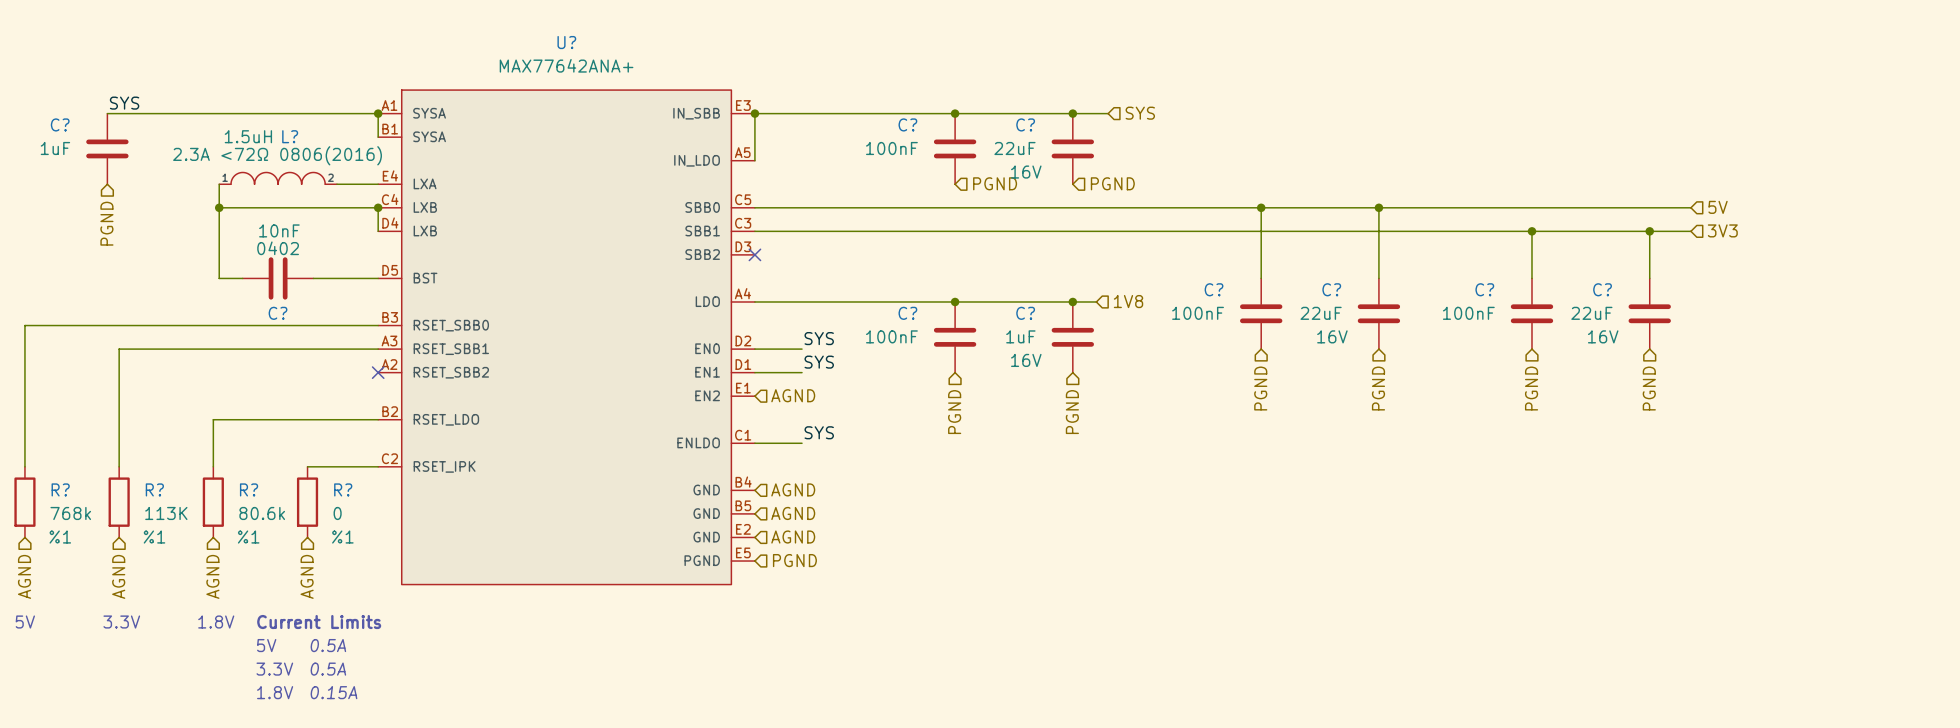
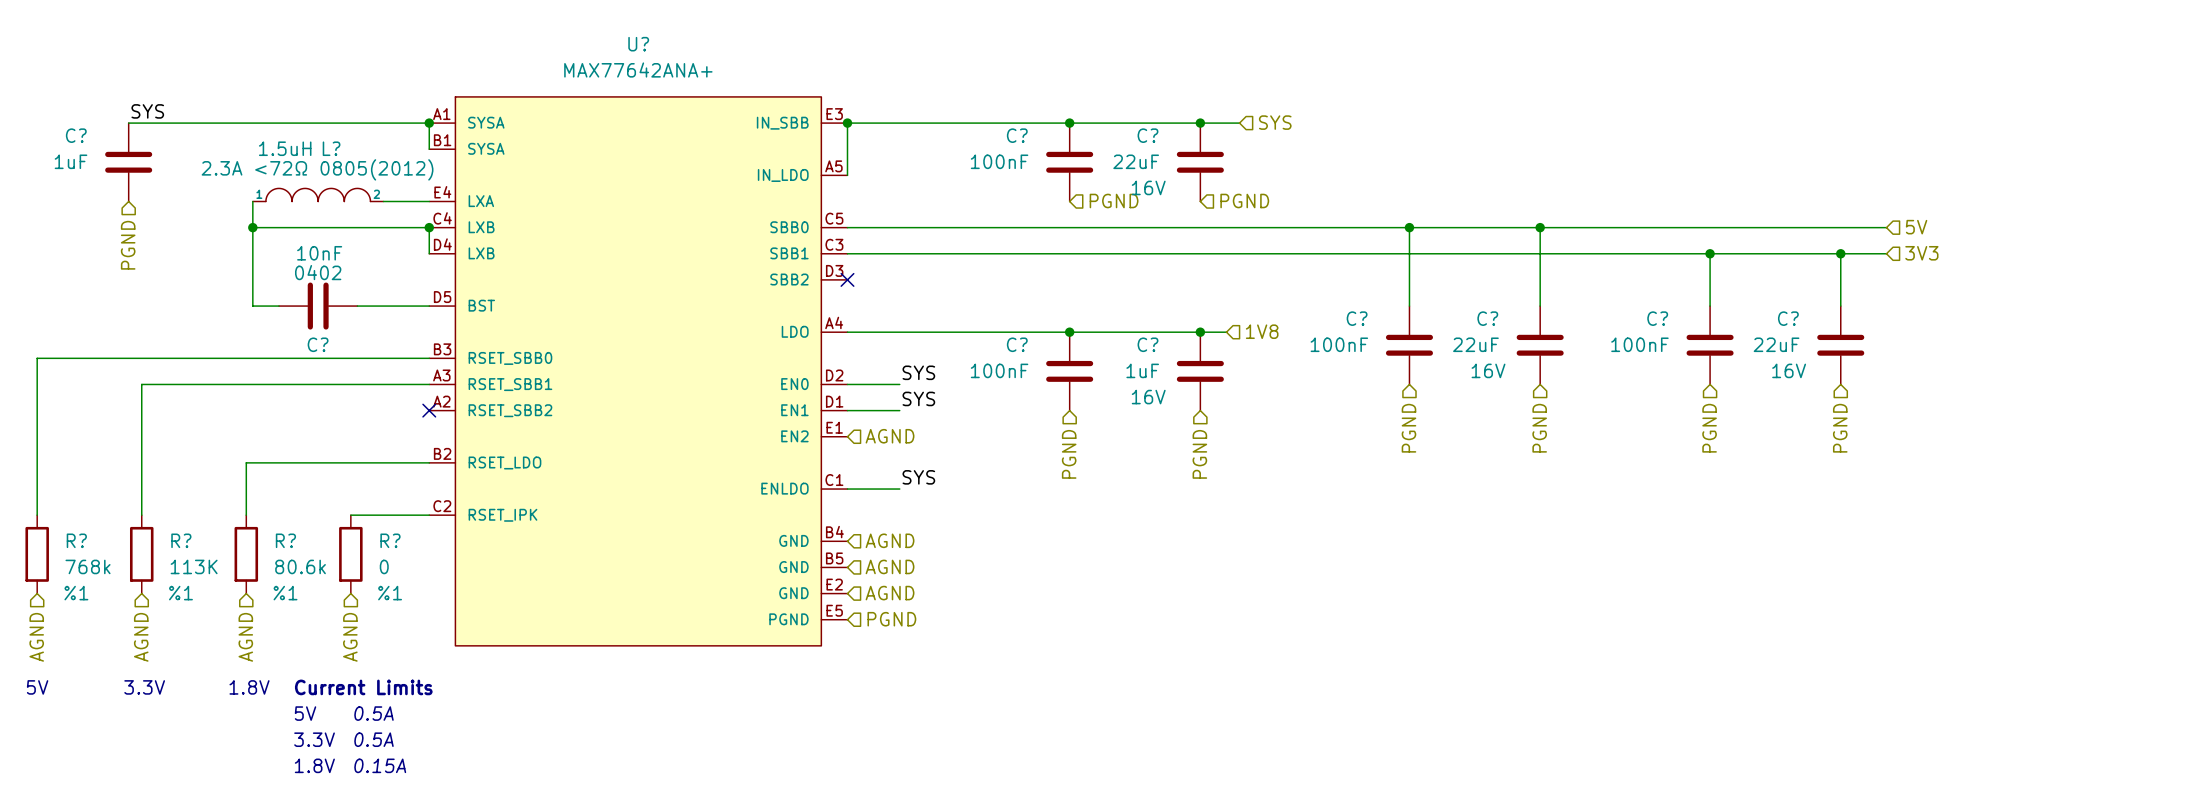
L? text: 2.3A <72Ω 0806(2016) (277, 155) -> 2.3A <72Ω 0805(2012) (317, 169)

